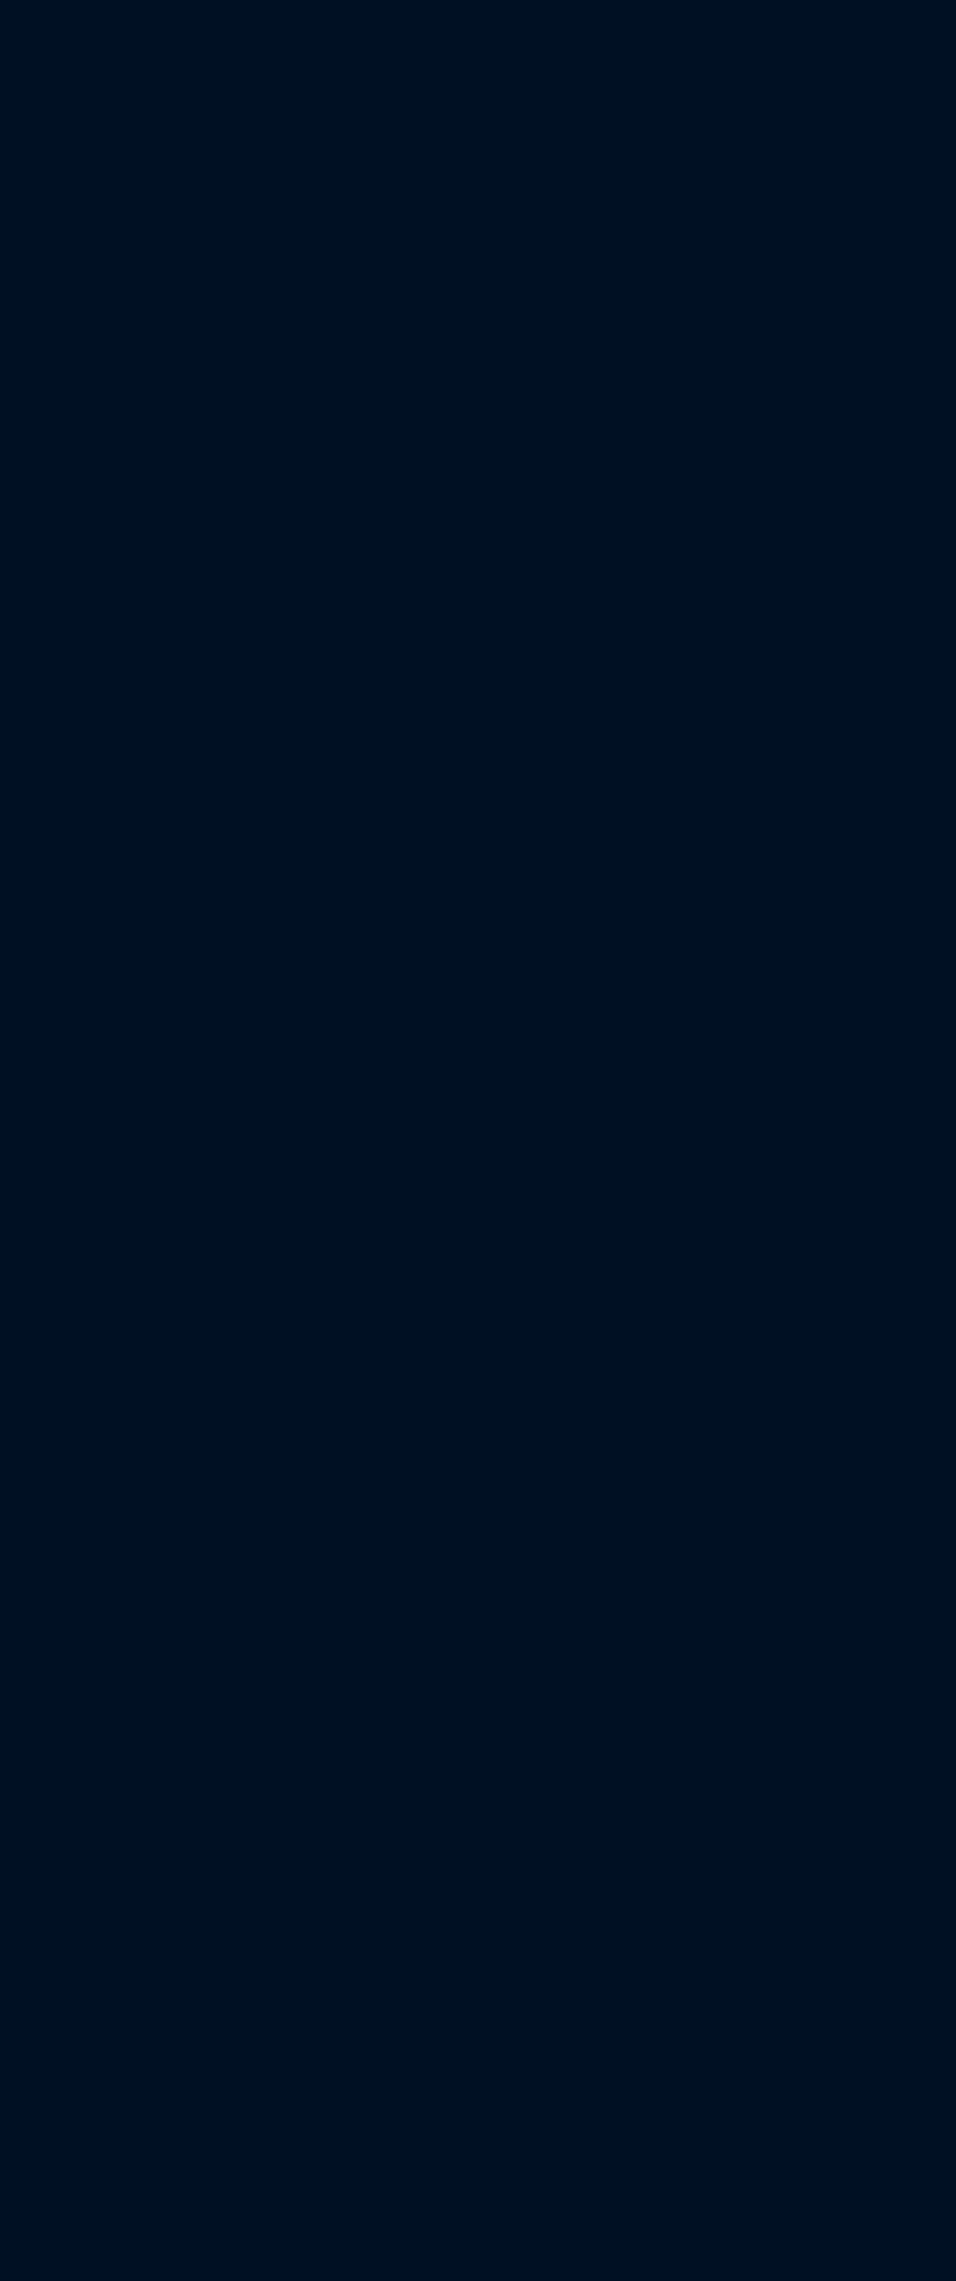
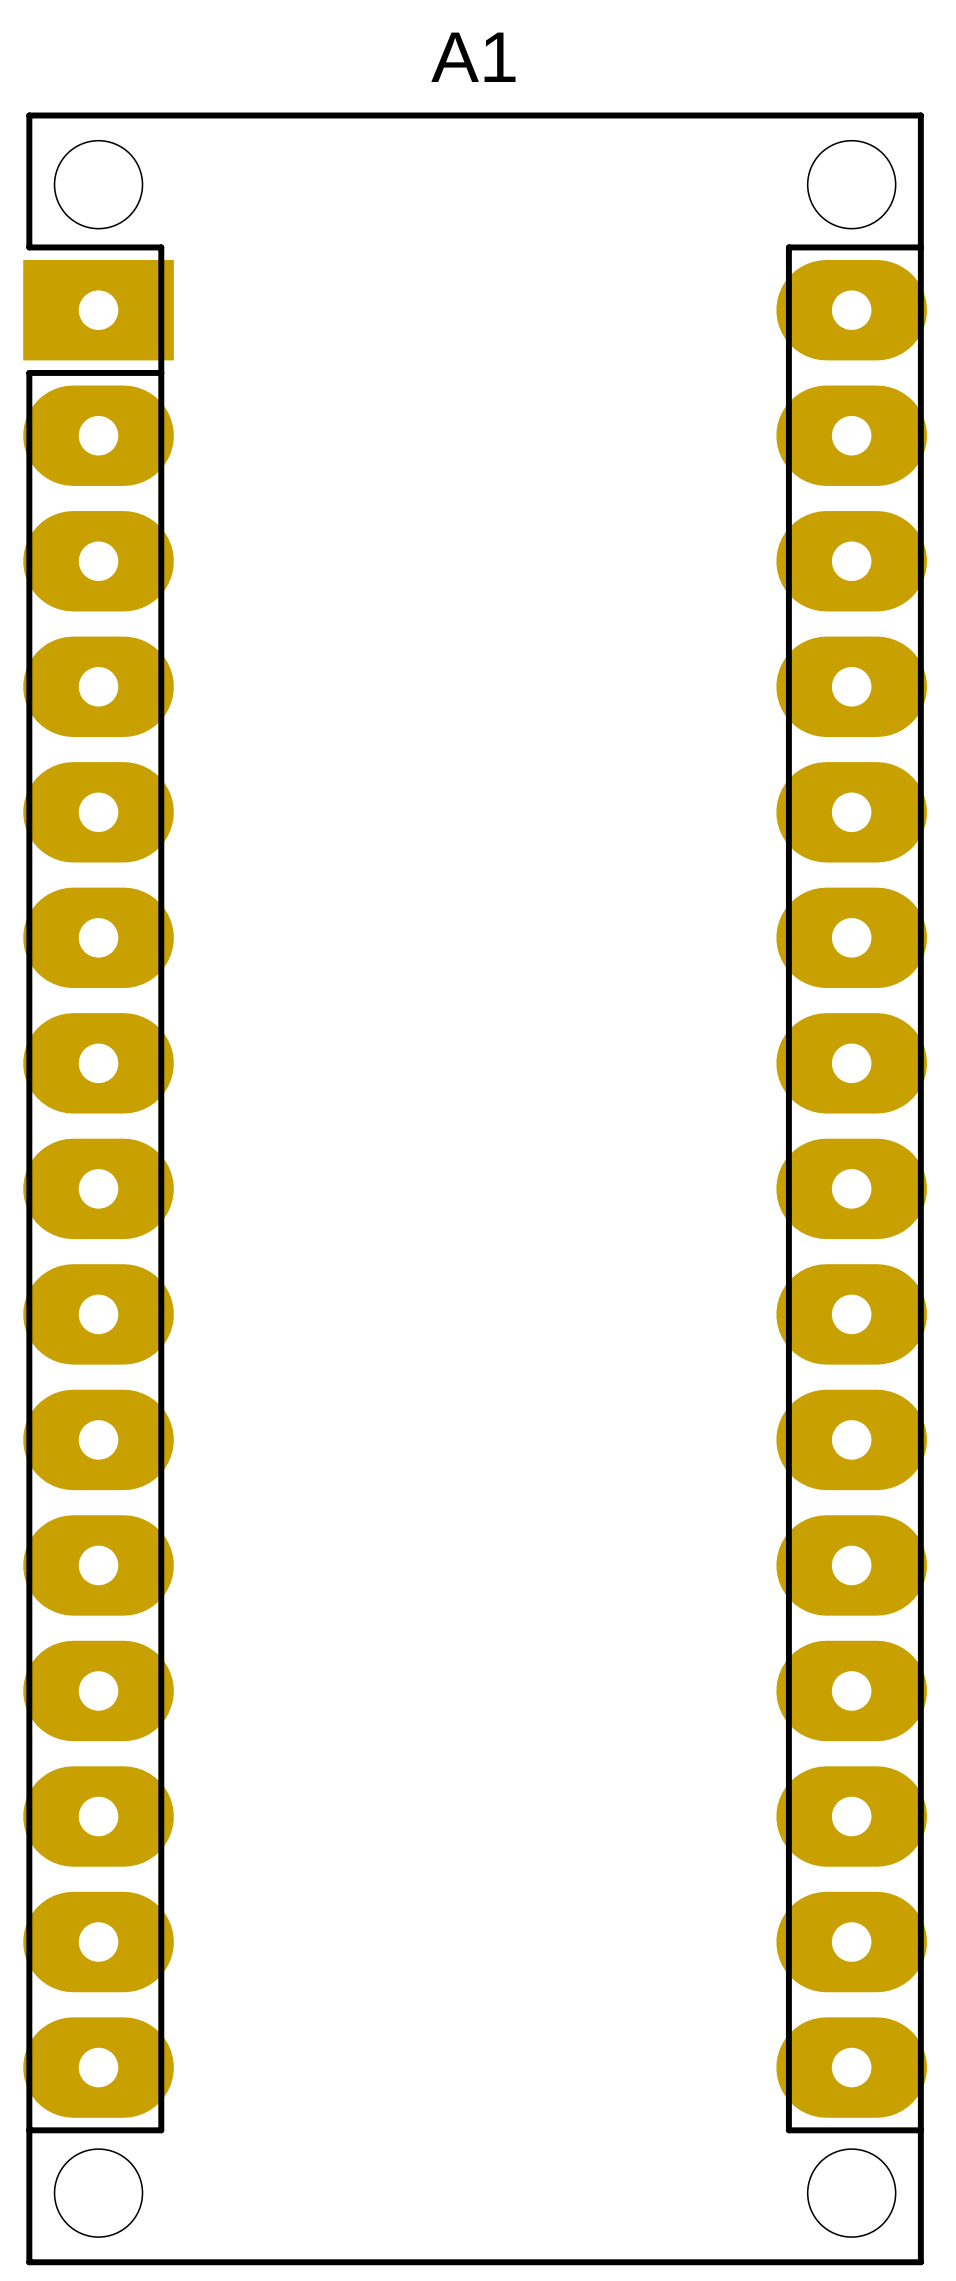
A1: none -> (475, 1188)

